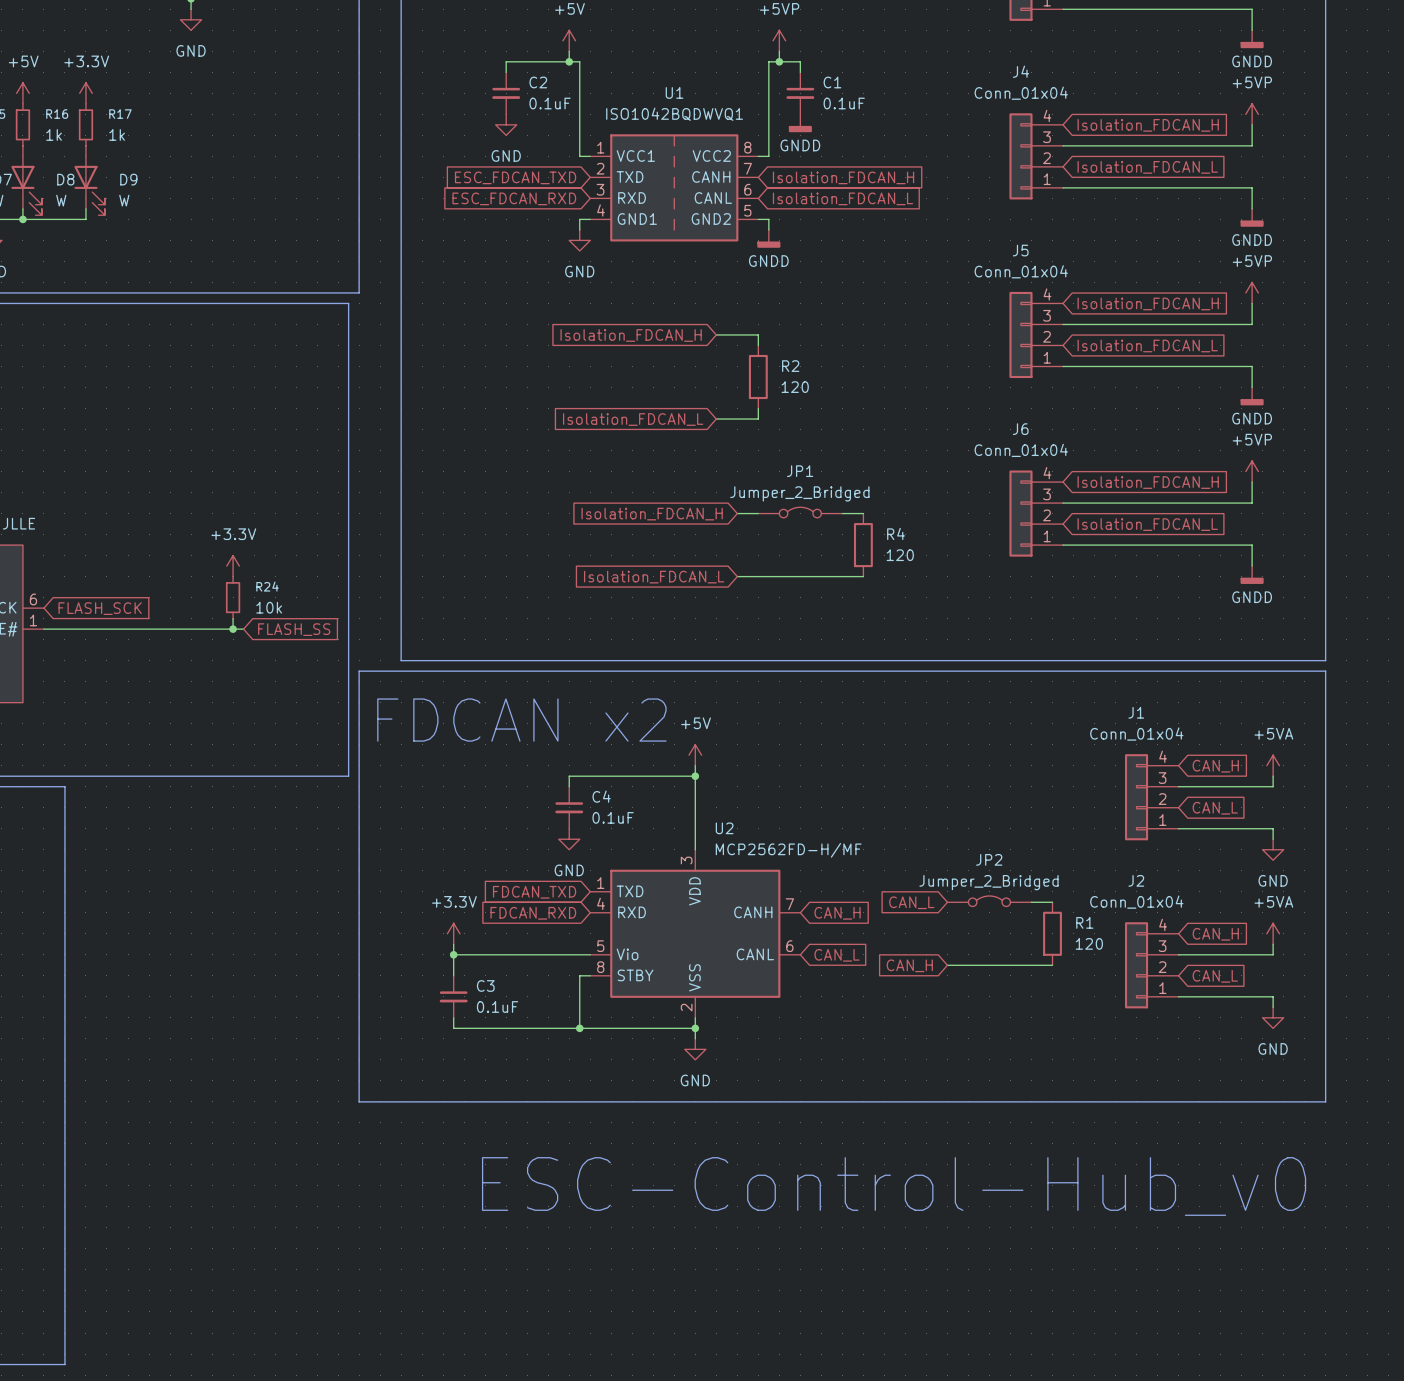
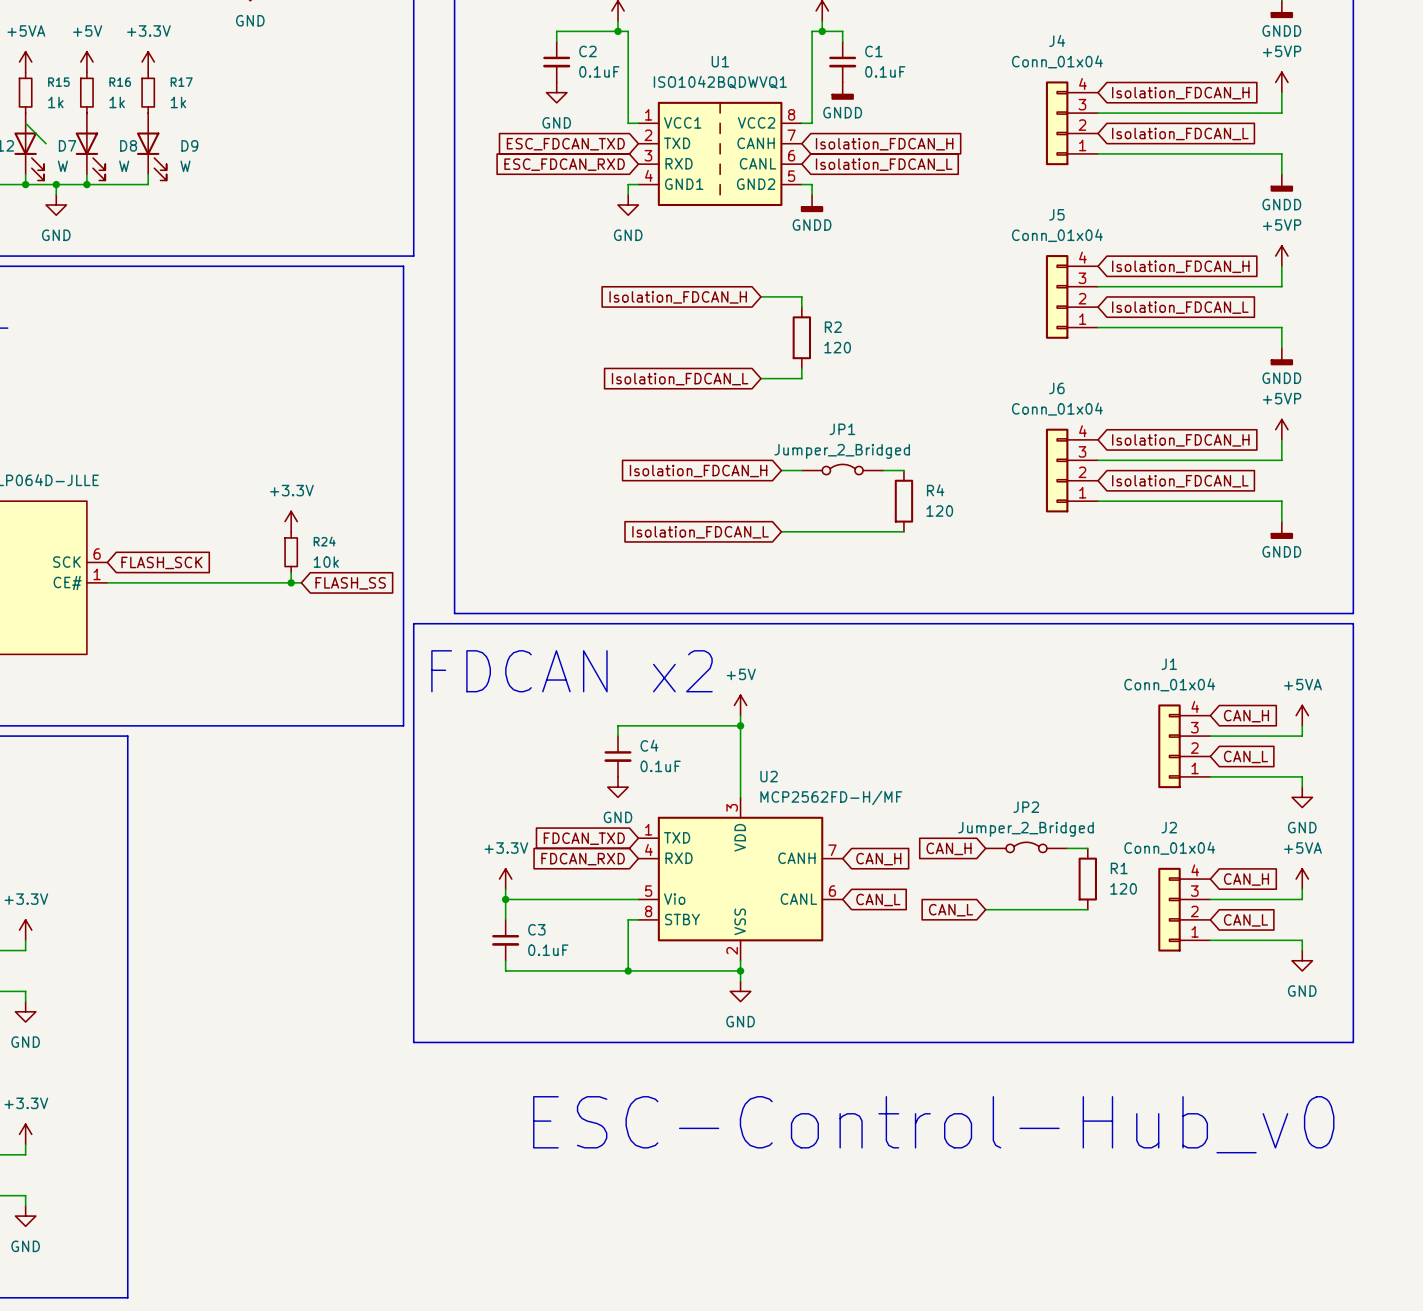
global label: CAN_L (911, 902) -> CAN_H (949, 848)
global label: CAN_H (909, 965) -> CAN_L (950, 910)

